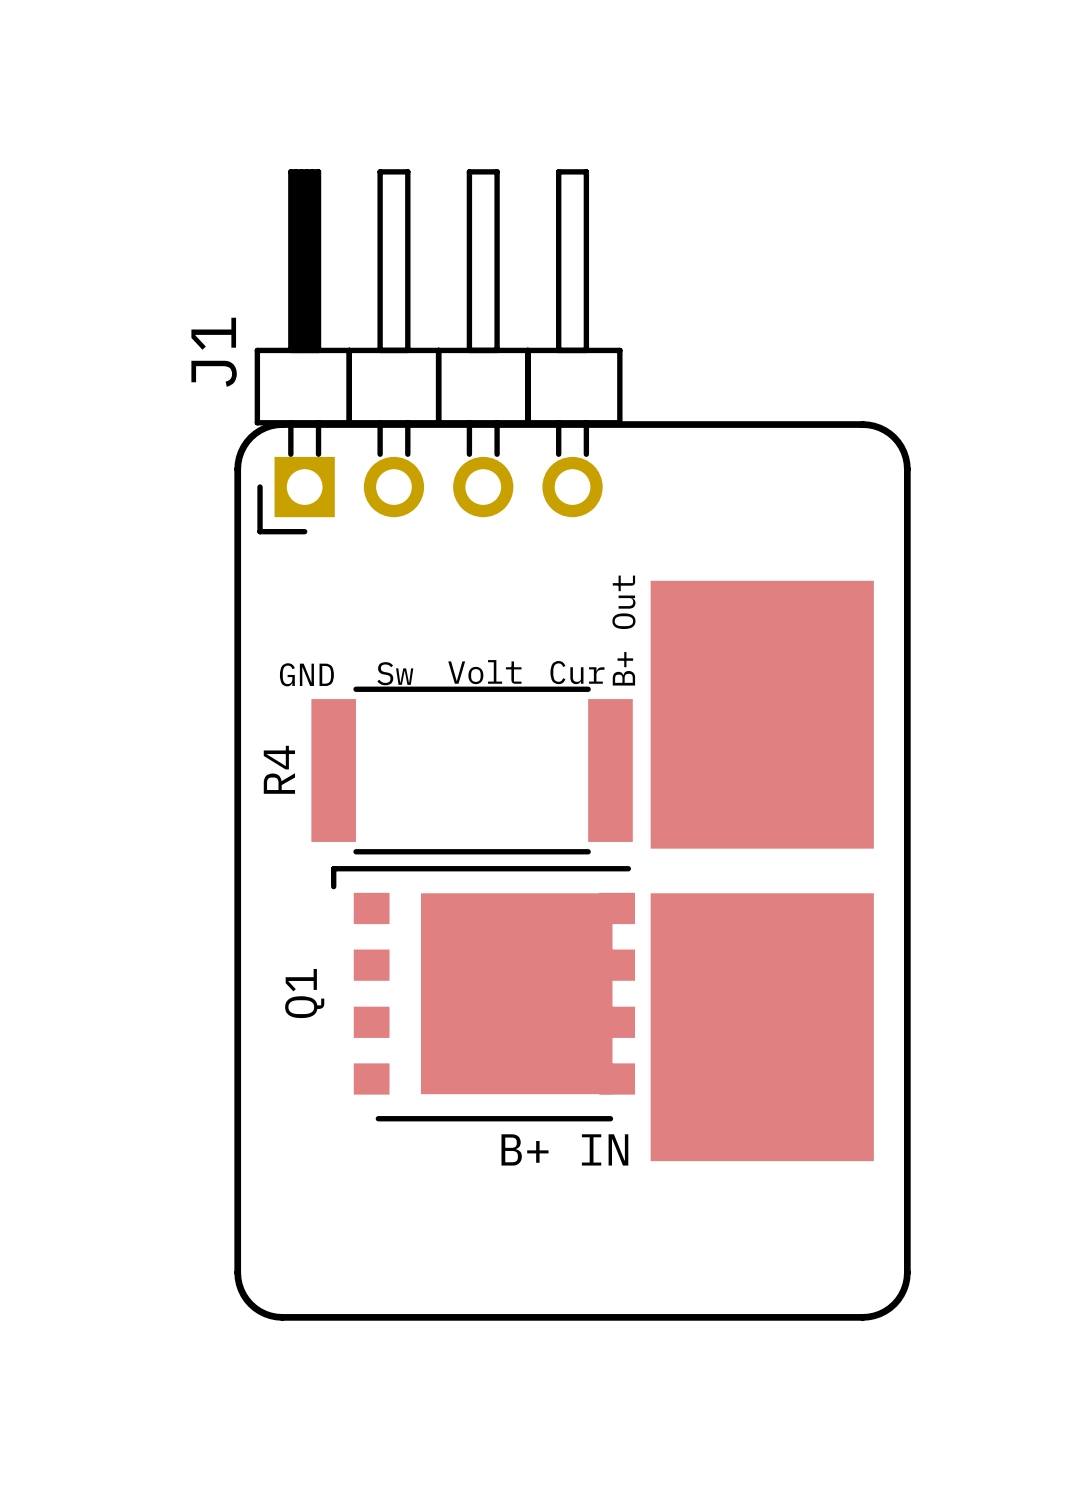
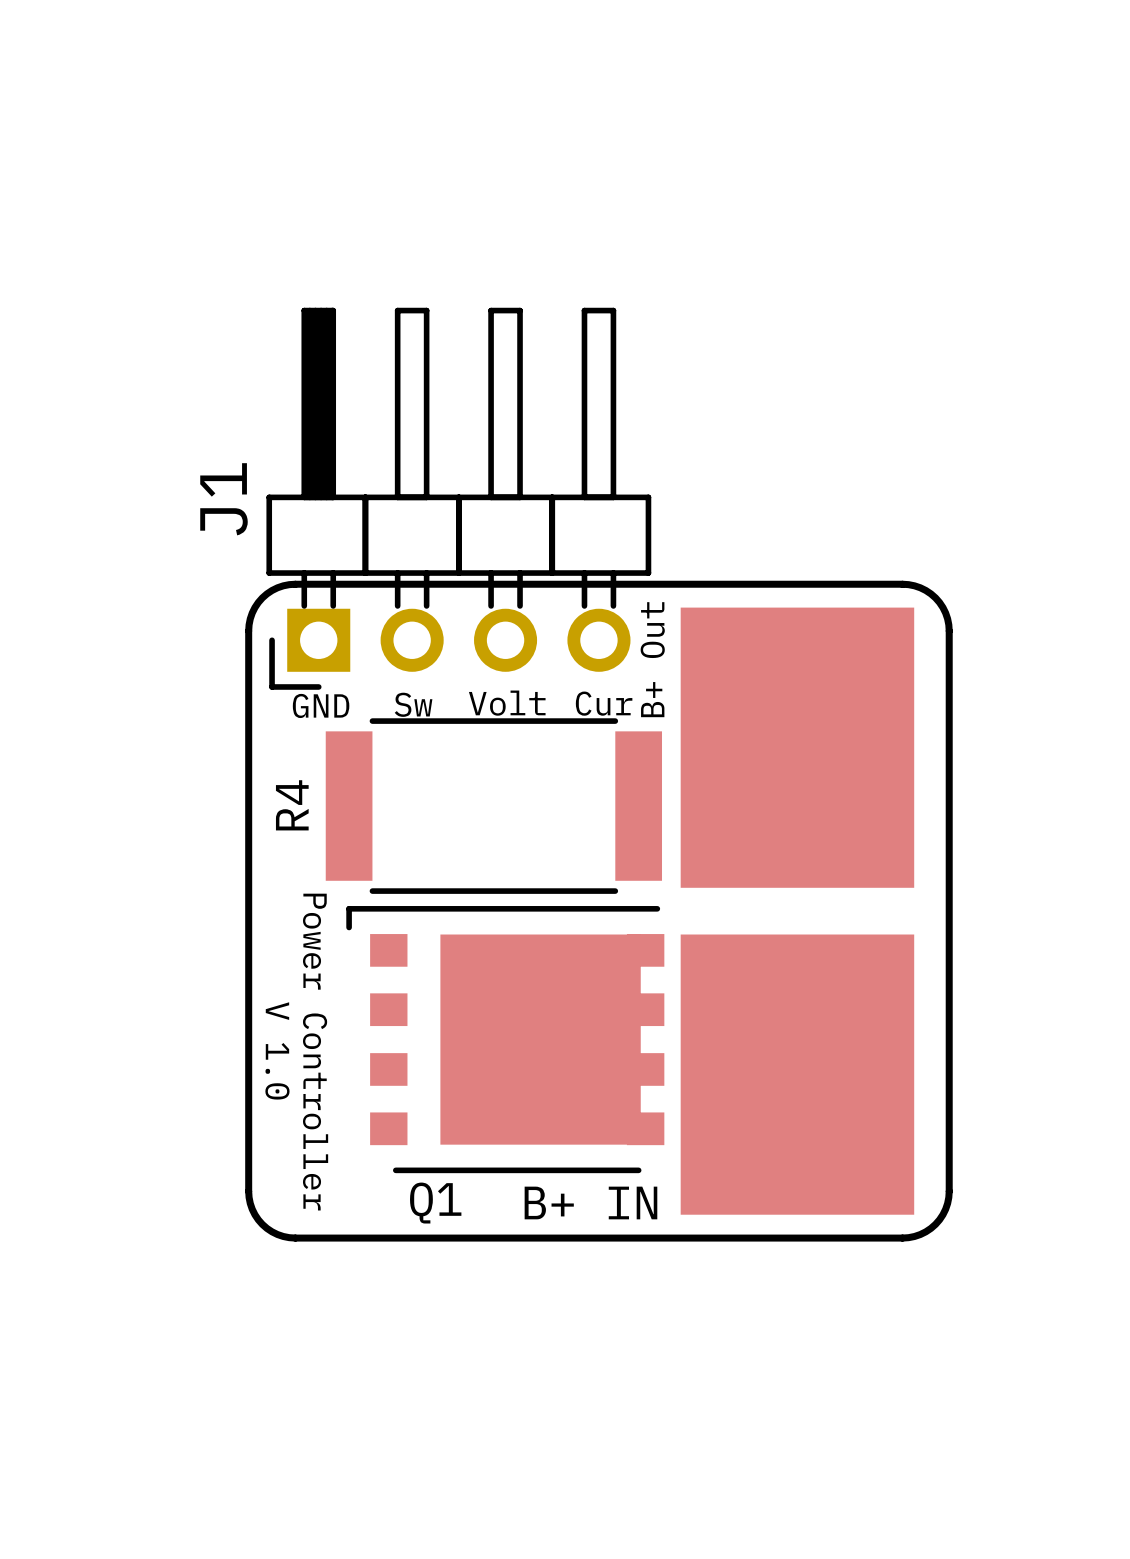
J1 position: (438, 351) -> (458, 498)
board edge: (237, 603) (239, 457) (246, 442) (255, 433) (265, 427) (282, 424) (874, 426) (889, 433) (898, 442) (903, 452) (906, 463) (907, 603) -> (248, 630) (252, 613) (262, 597) (277, 587) (295, 584) (908, 584) (925, 590) (939, 602) (947, 618) (949, 630)
Q1 name rotation: 0° (304, 993) -> 90° clockwise (435, 1203)
Q1 name position: Q1 (304, 993) -> Q1 (435, 1203)
text: none -> V 1.0 (277, 1050)
text: none -> Power Controller (315, 1052)
board edge: (237, 1138) (239, 1284) (246, 1299) (255, 1308) (265, 1313) (282, 1317) (874, 1315) (889, 1308) (898, 1299) (903, 1289) (906, 1278) (907, 1138) -> (248, 1191) (252, 1209) (262, 1224) (277, 1234) (295, 1238) (908, 1237) (925, 1231) (939, 1219) (947, 1203) (949, 1191)

